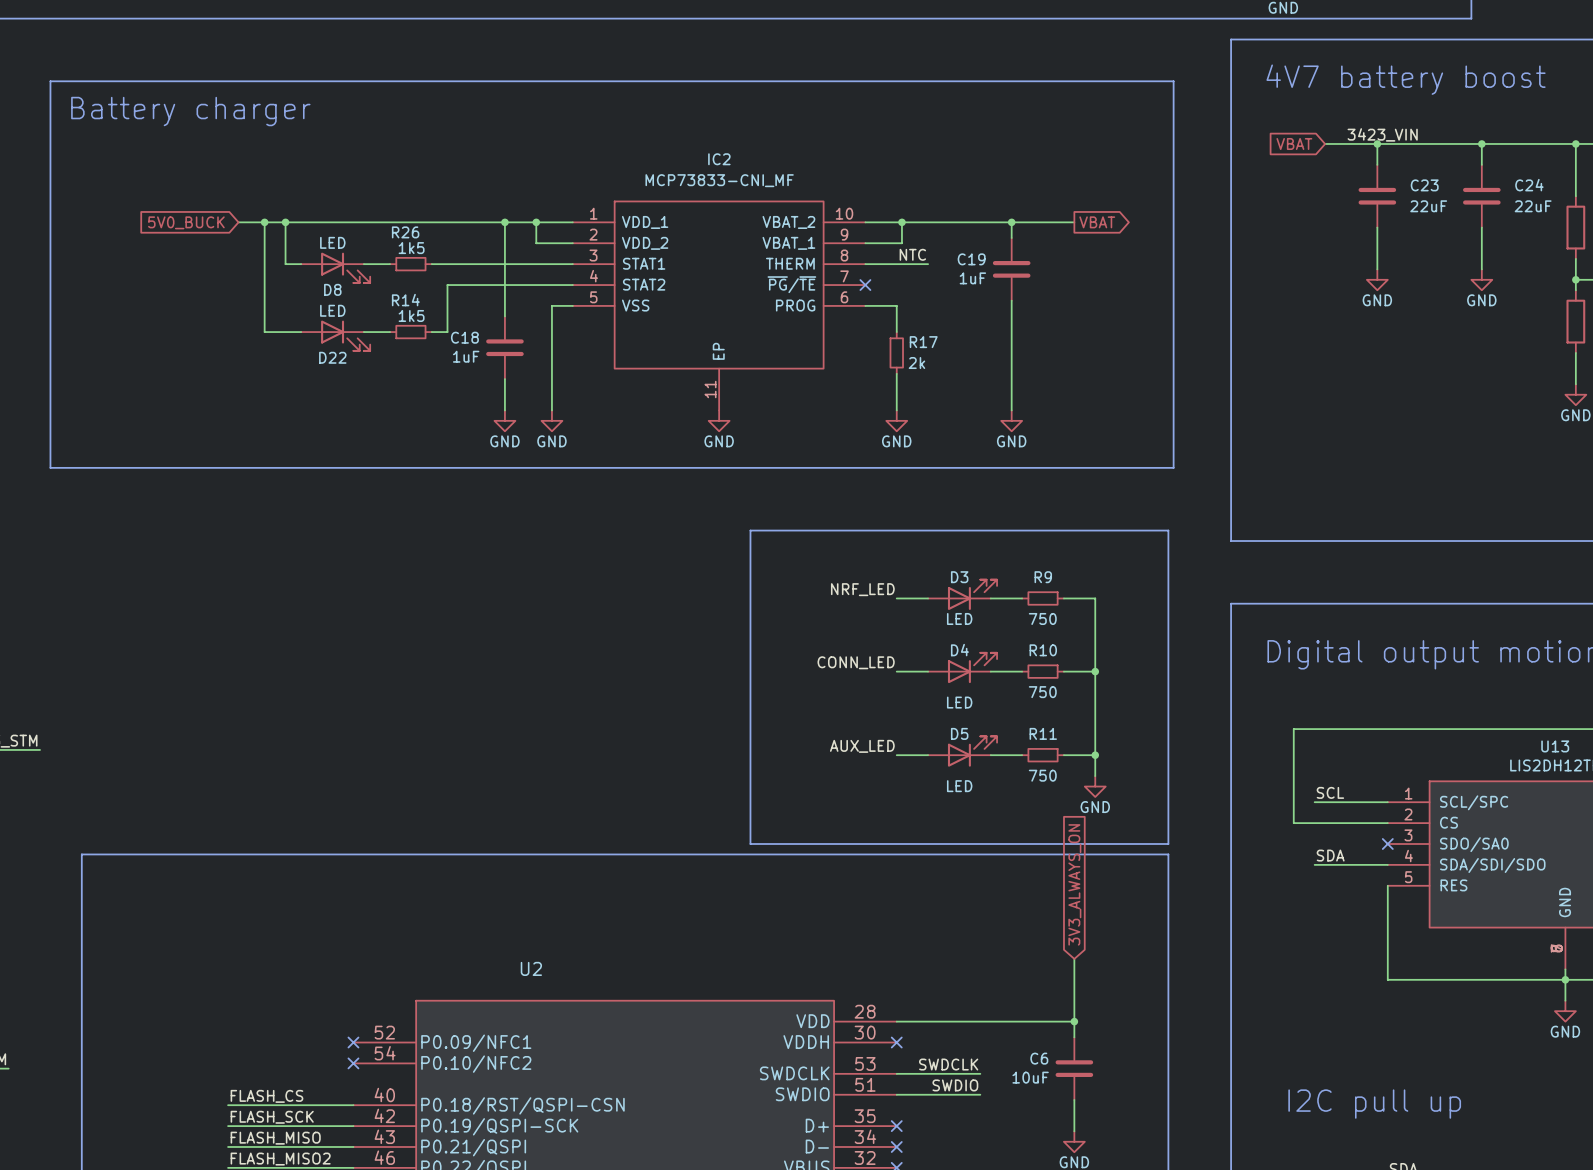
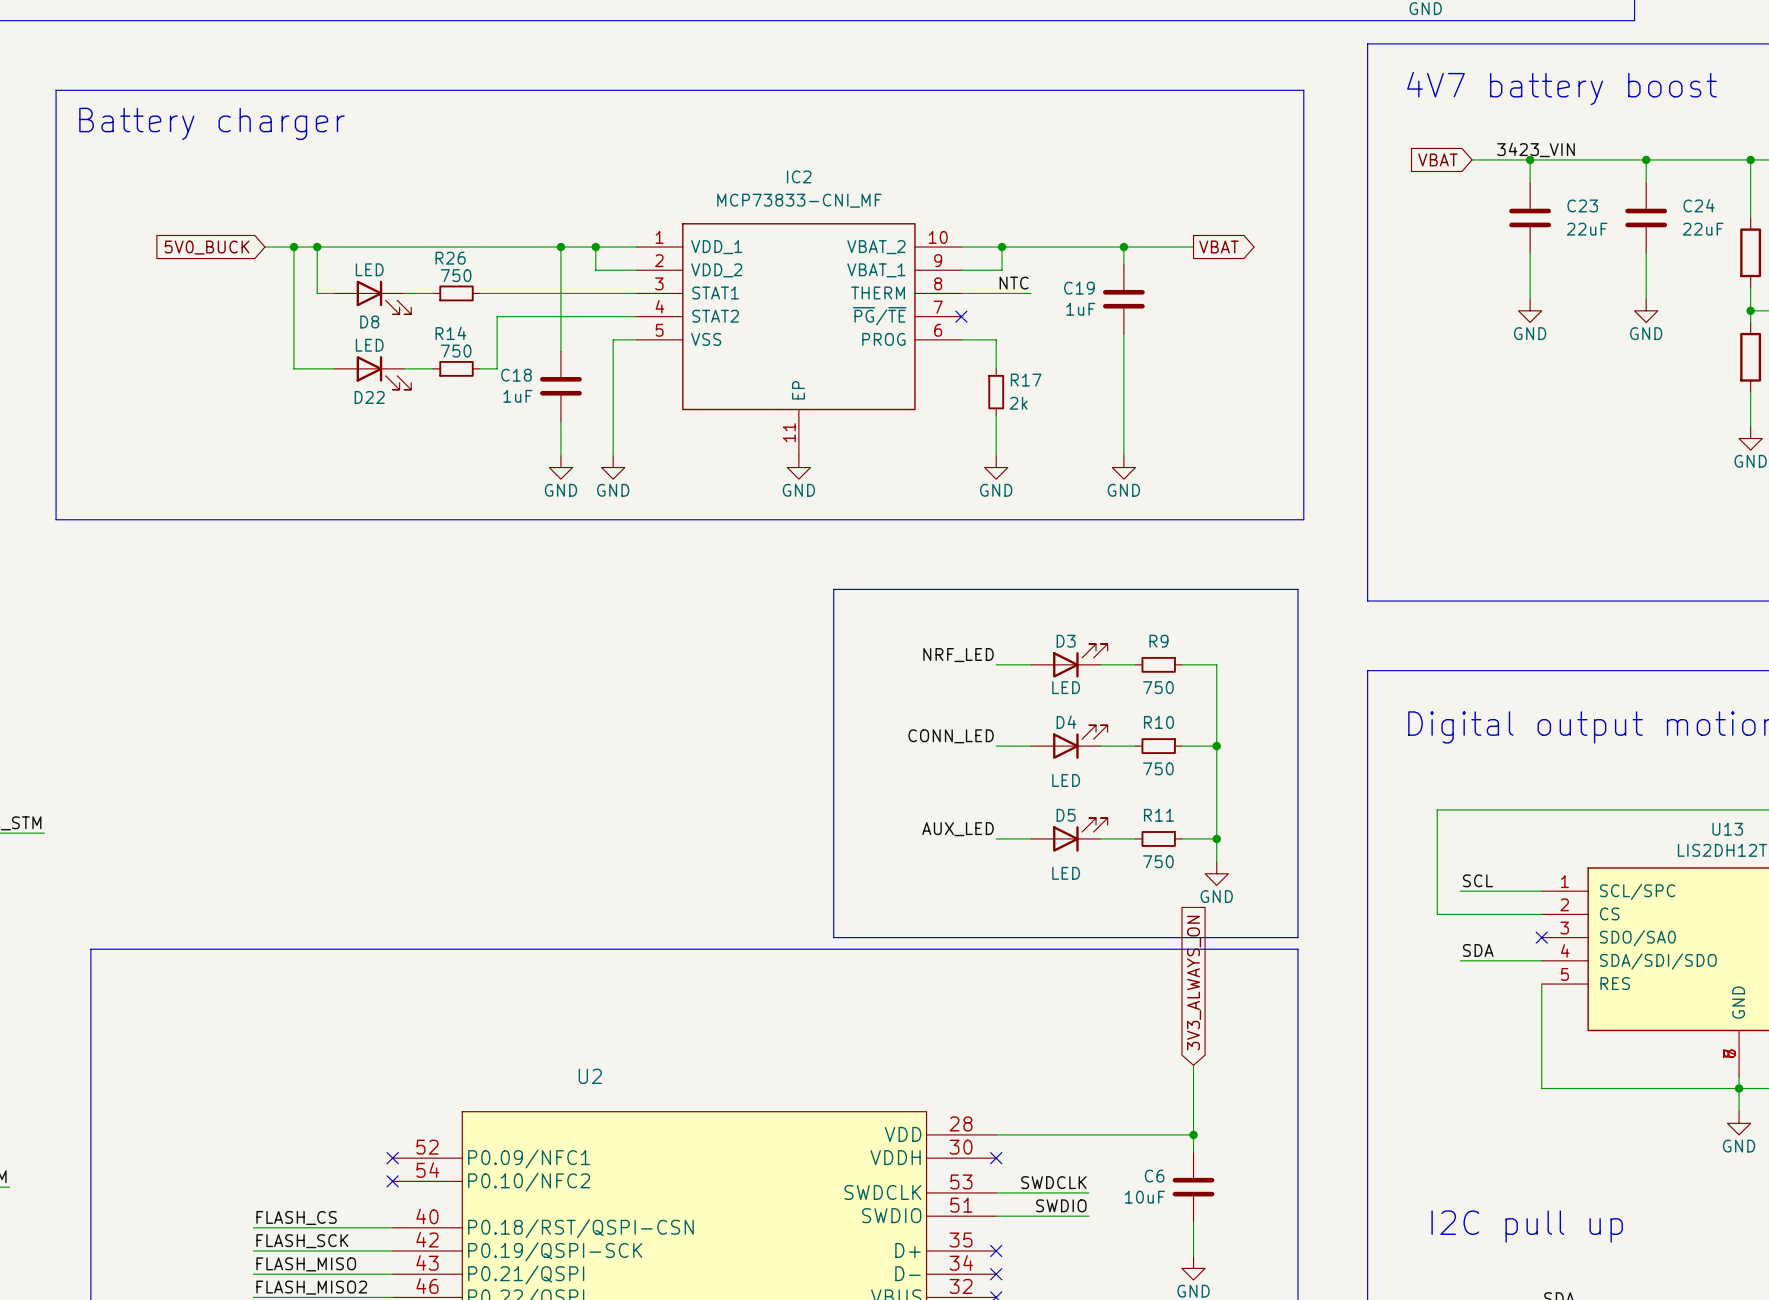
R26 value: 1k5 (411, 248) -> 750 (456, 275)
R14 value: 1k5 (411, 315) -> 750 (456, 351)

